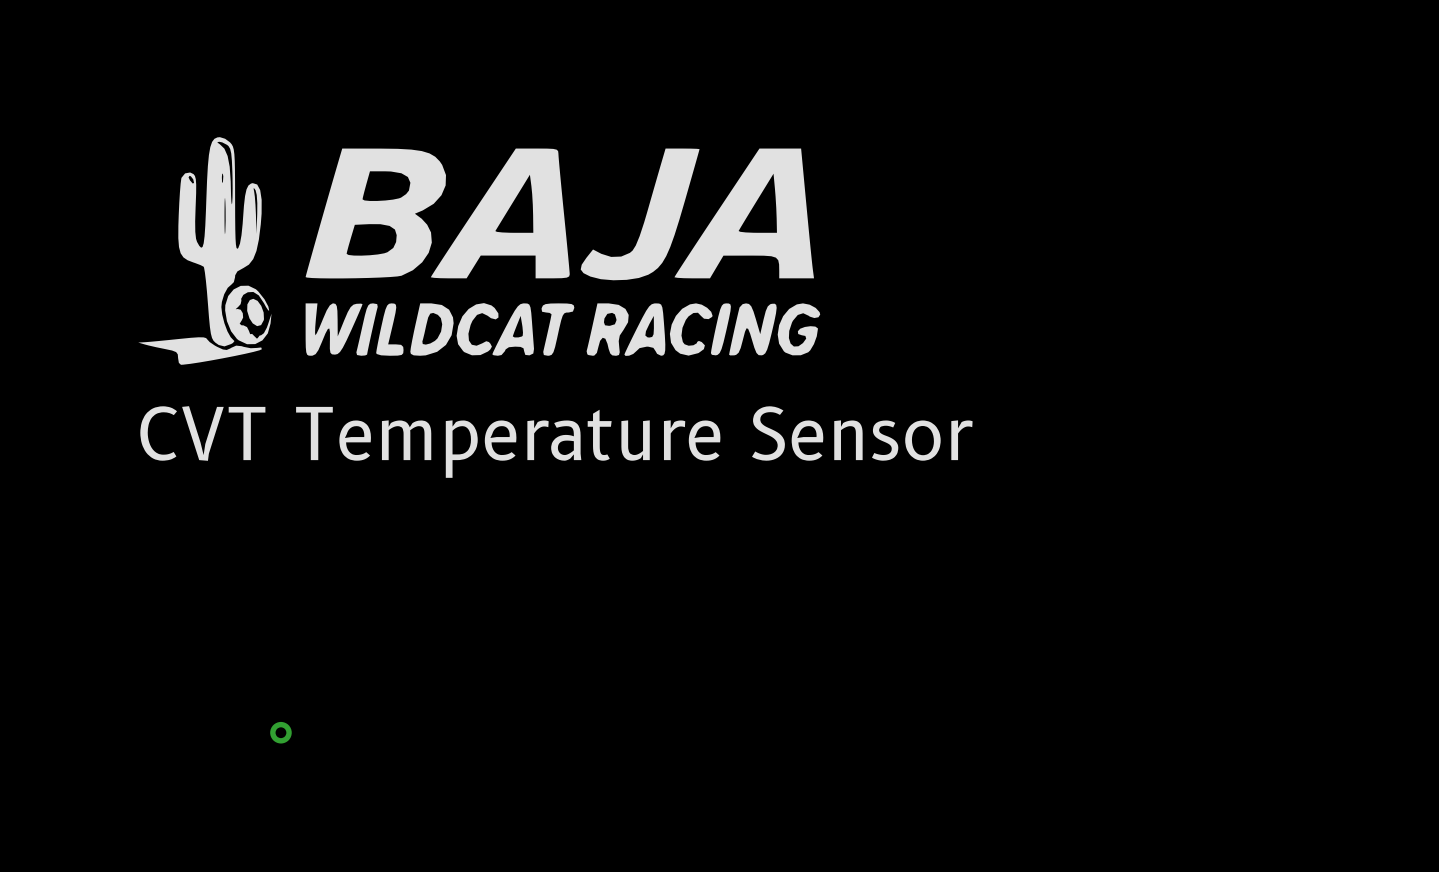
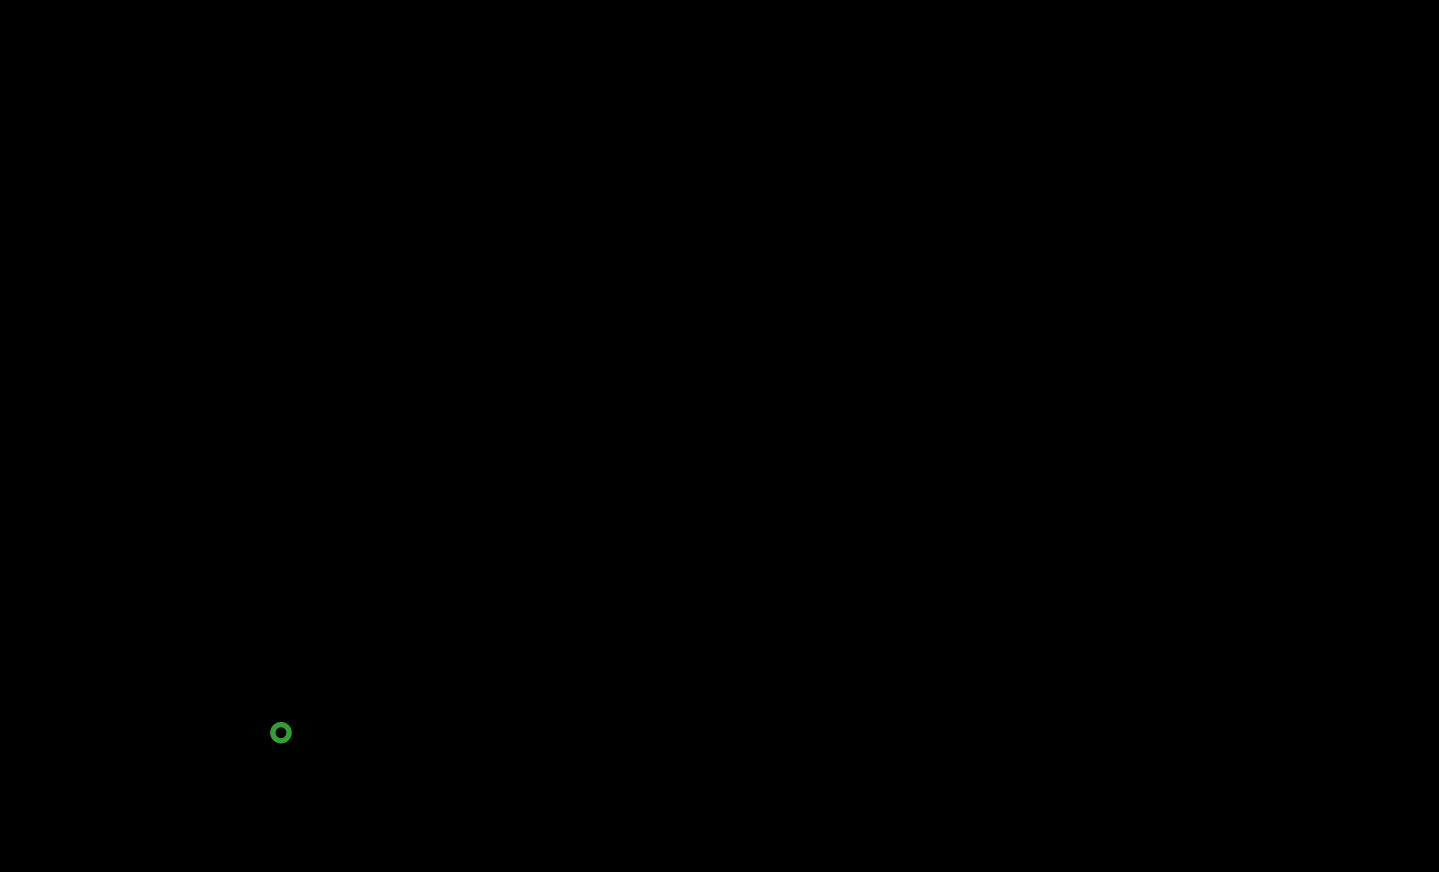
drawing: [138, 137, 821, 365] -> none
text: CVT Temperature Sensor (556, 442) -> none

